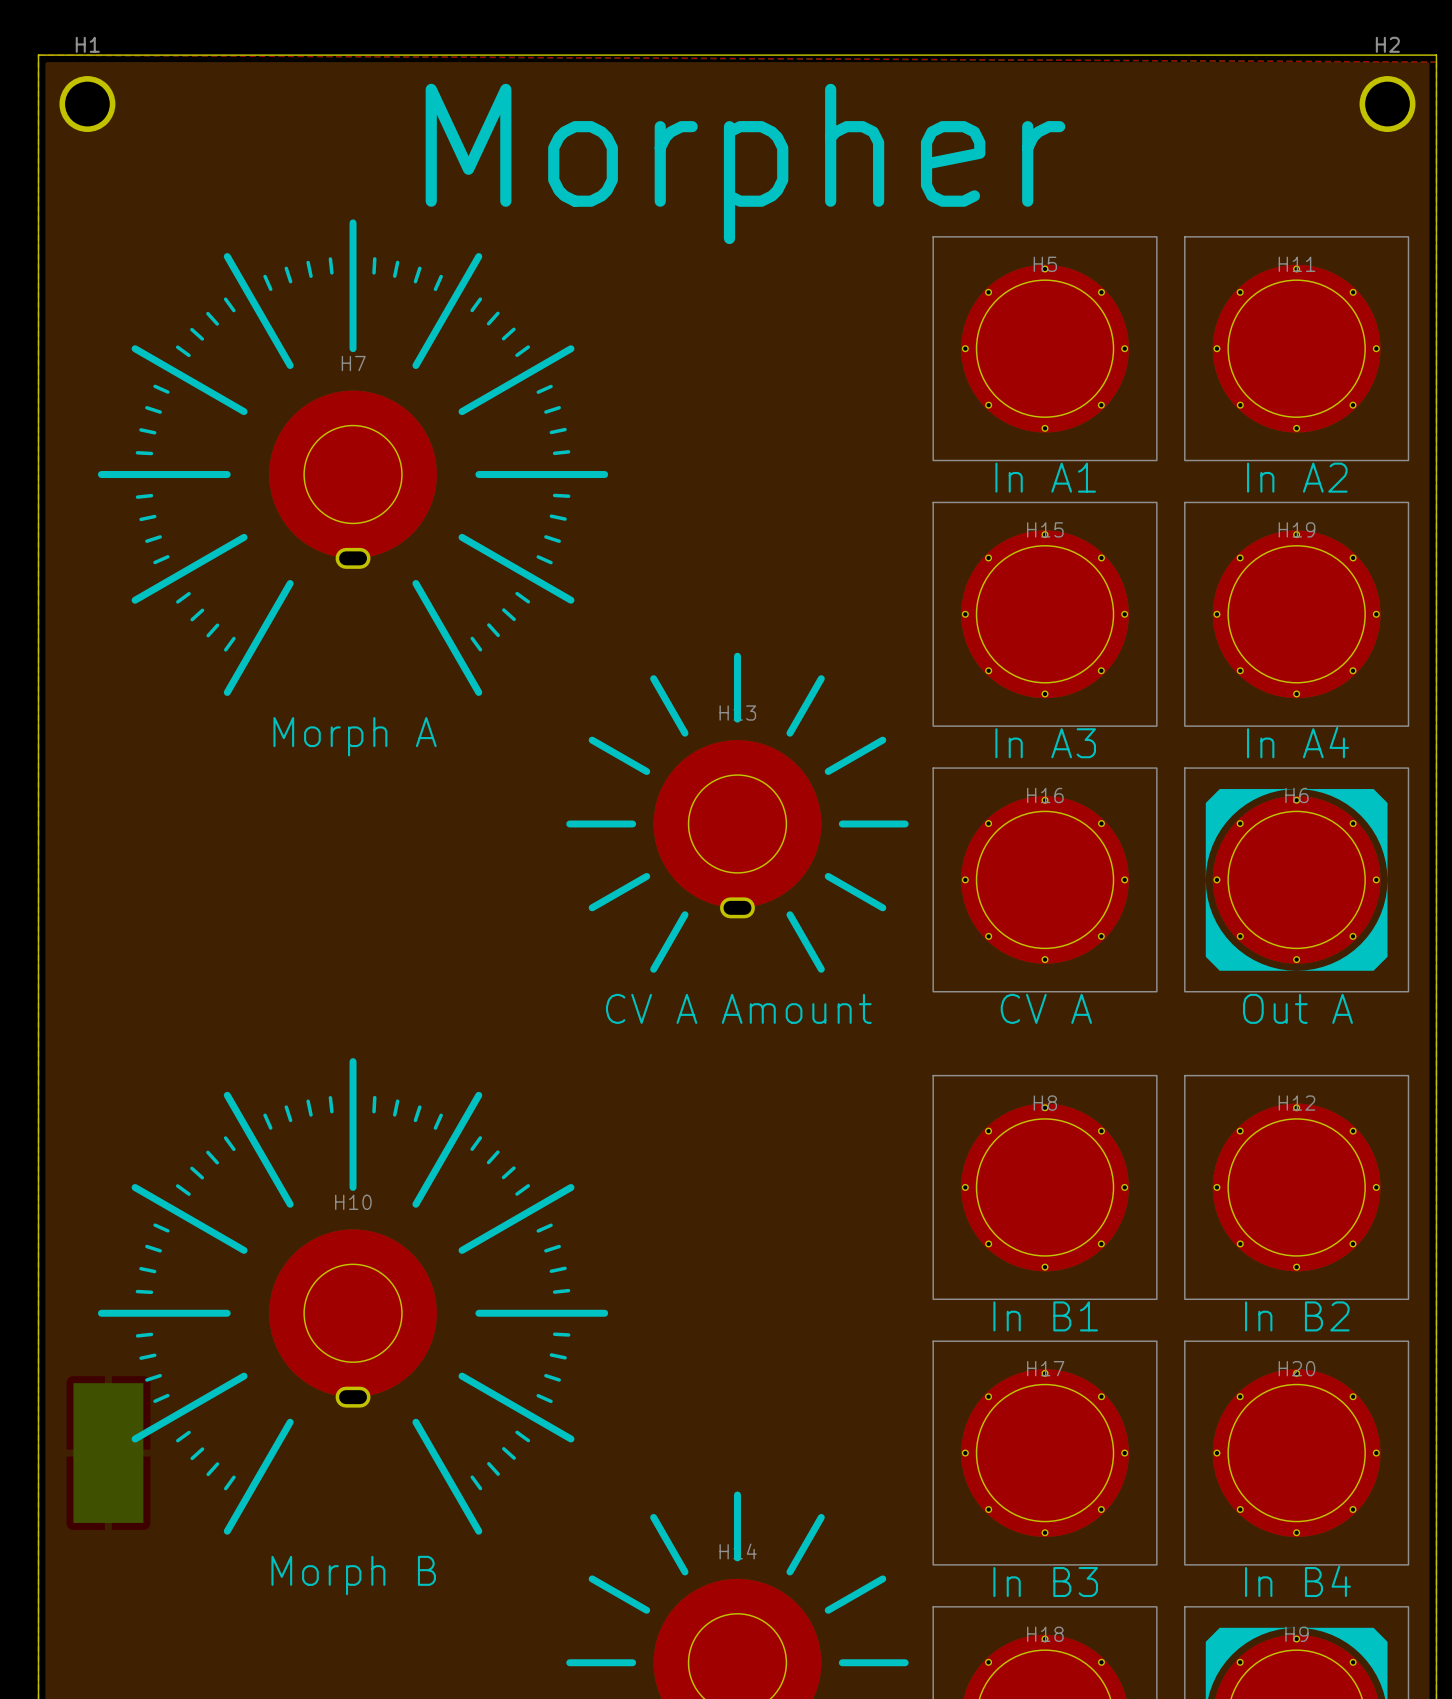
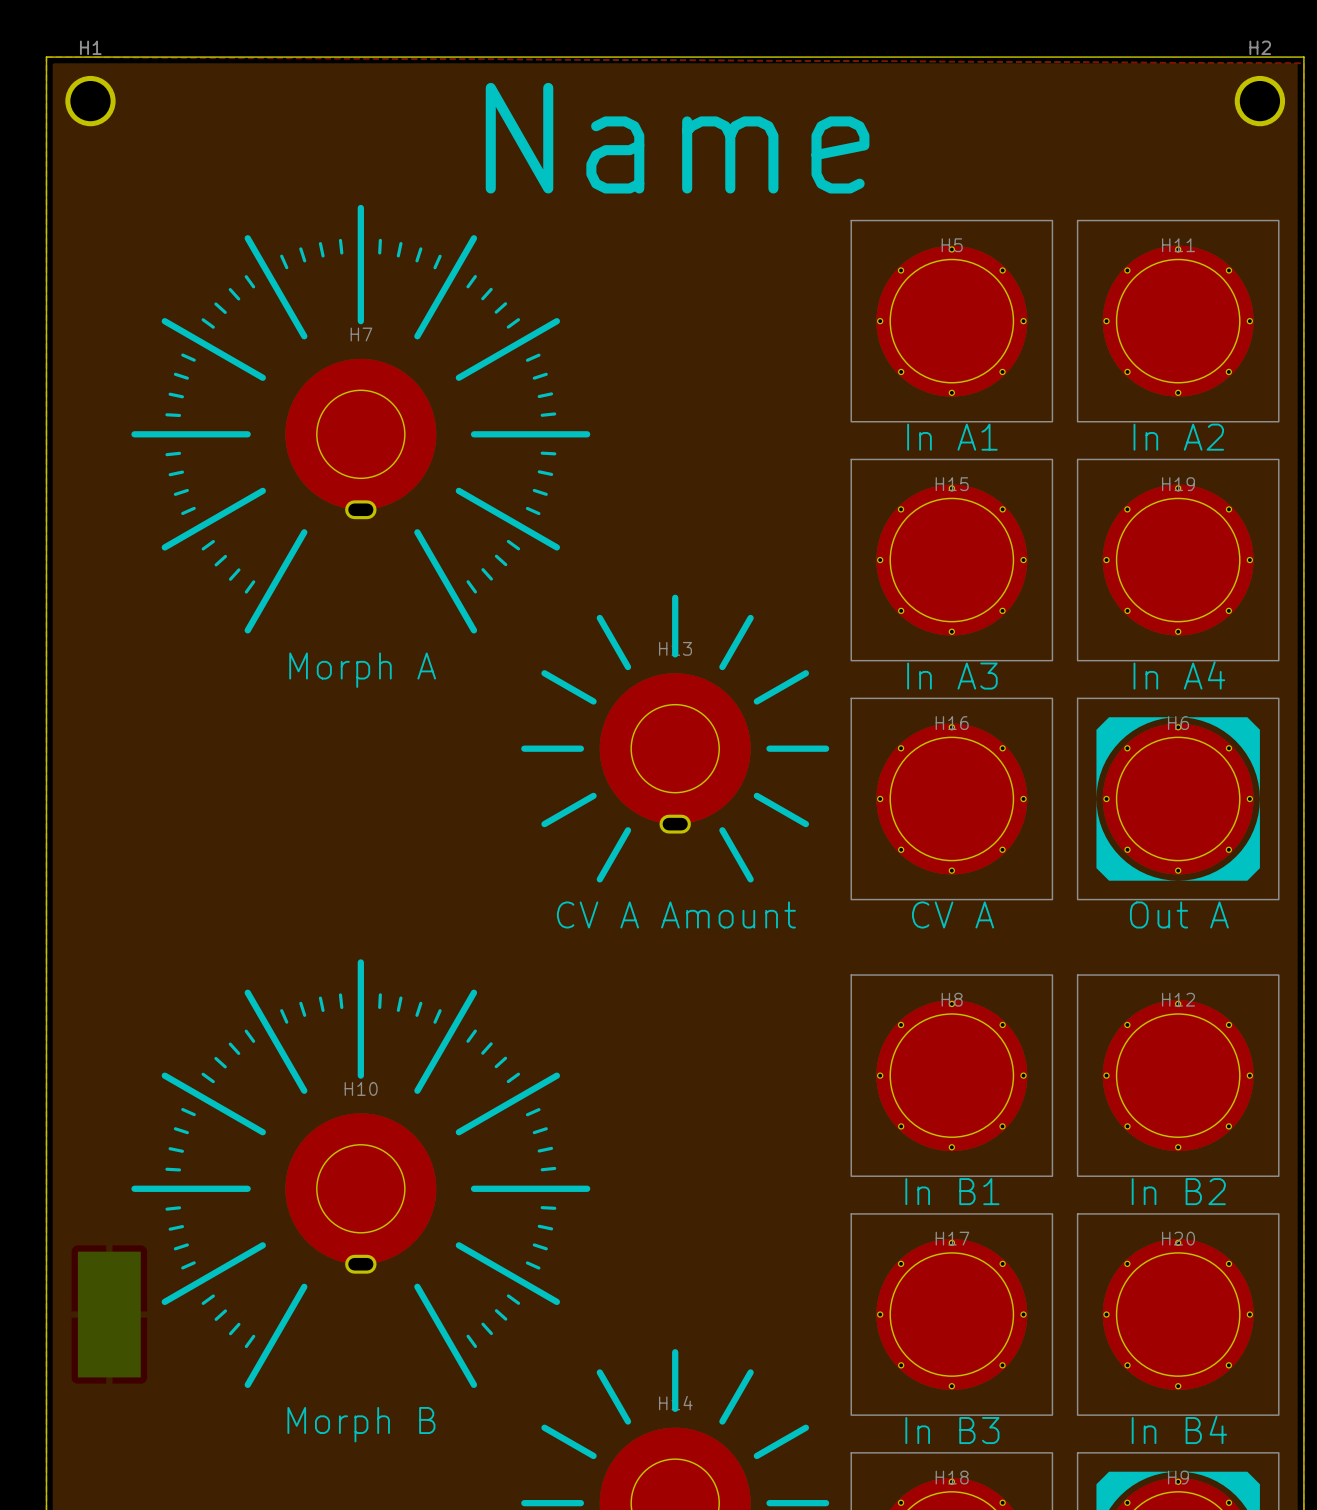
text: Morpher (745, 163) -> Name (677, 138)
H7 position: (353, 457) -> (360, 419)
H10 position: (353, 1296) -> (360, 1173)

